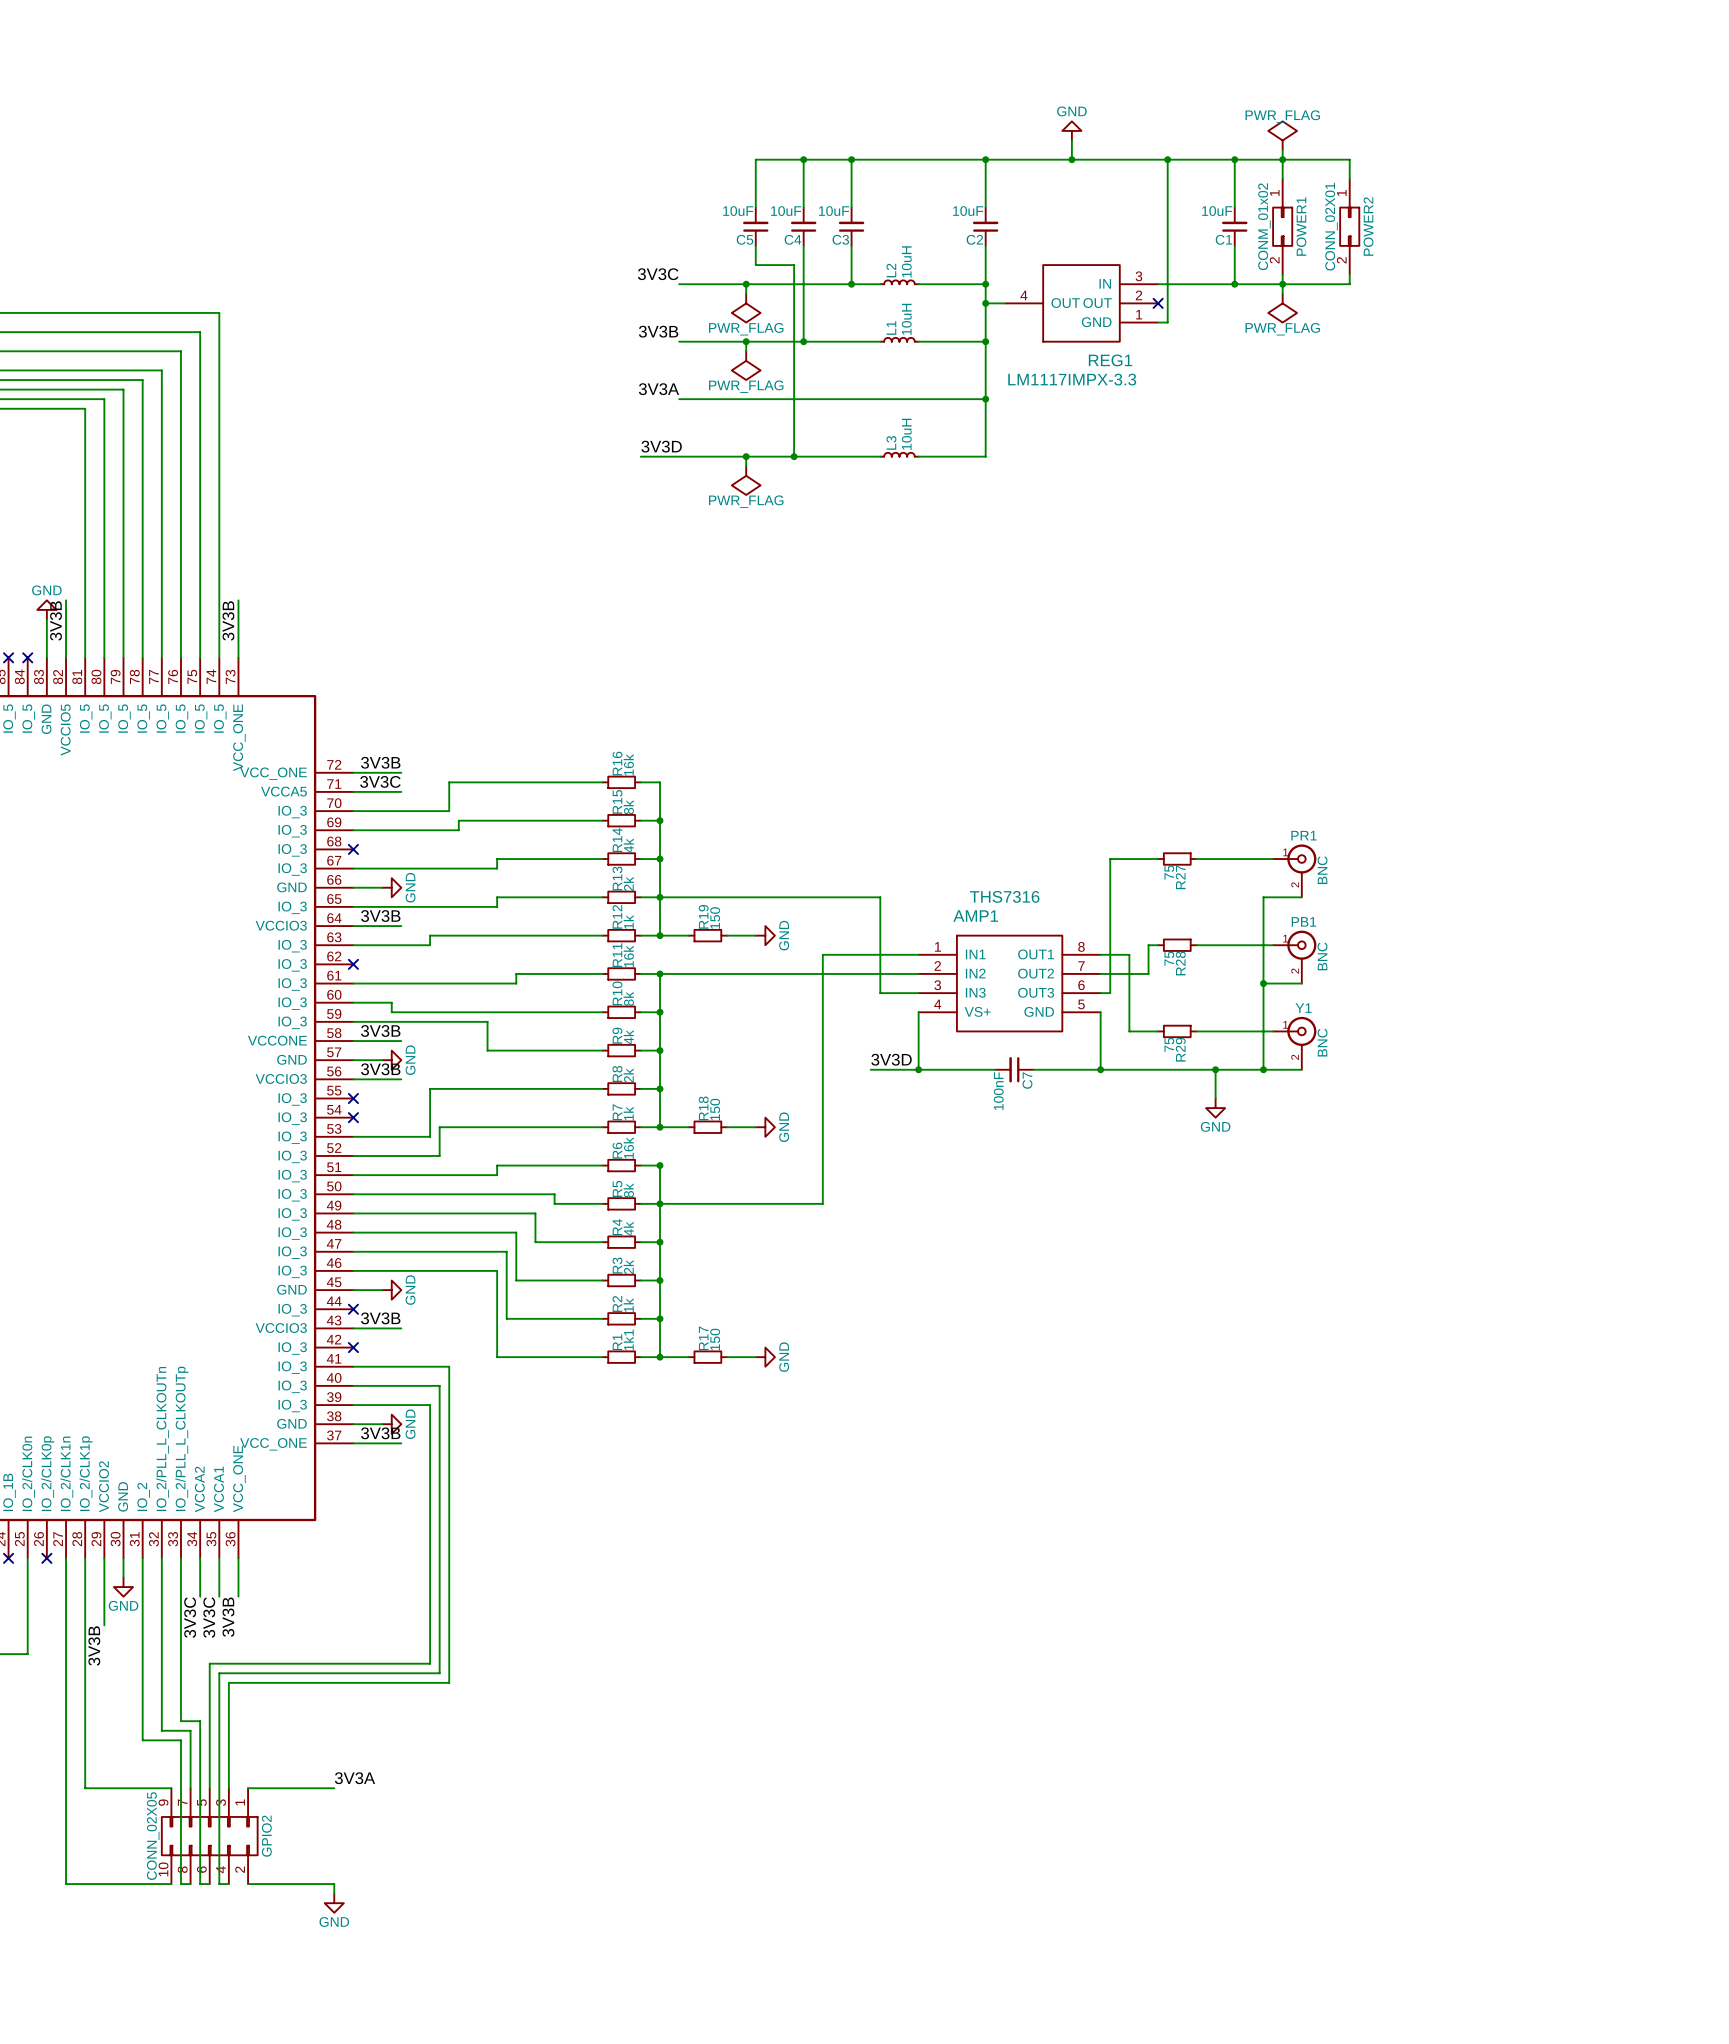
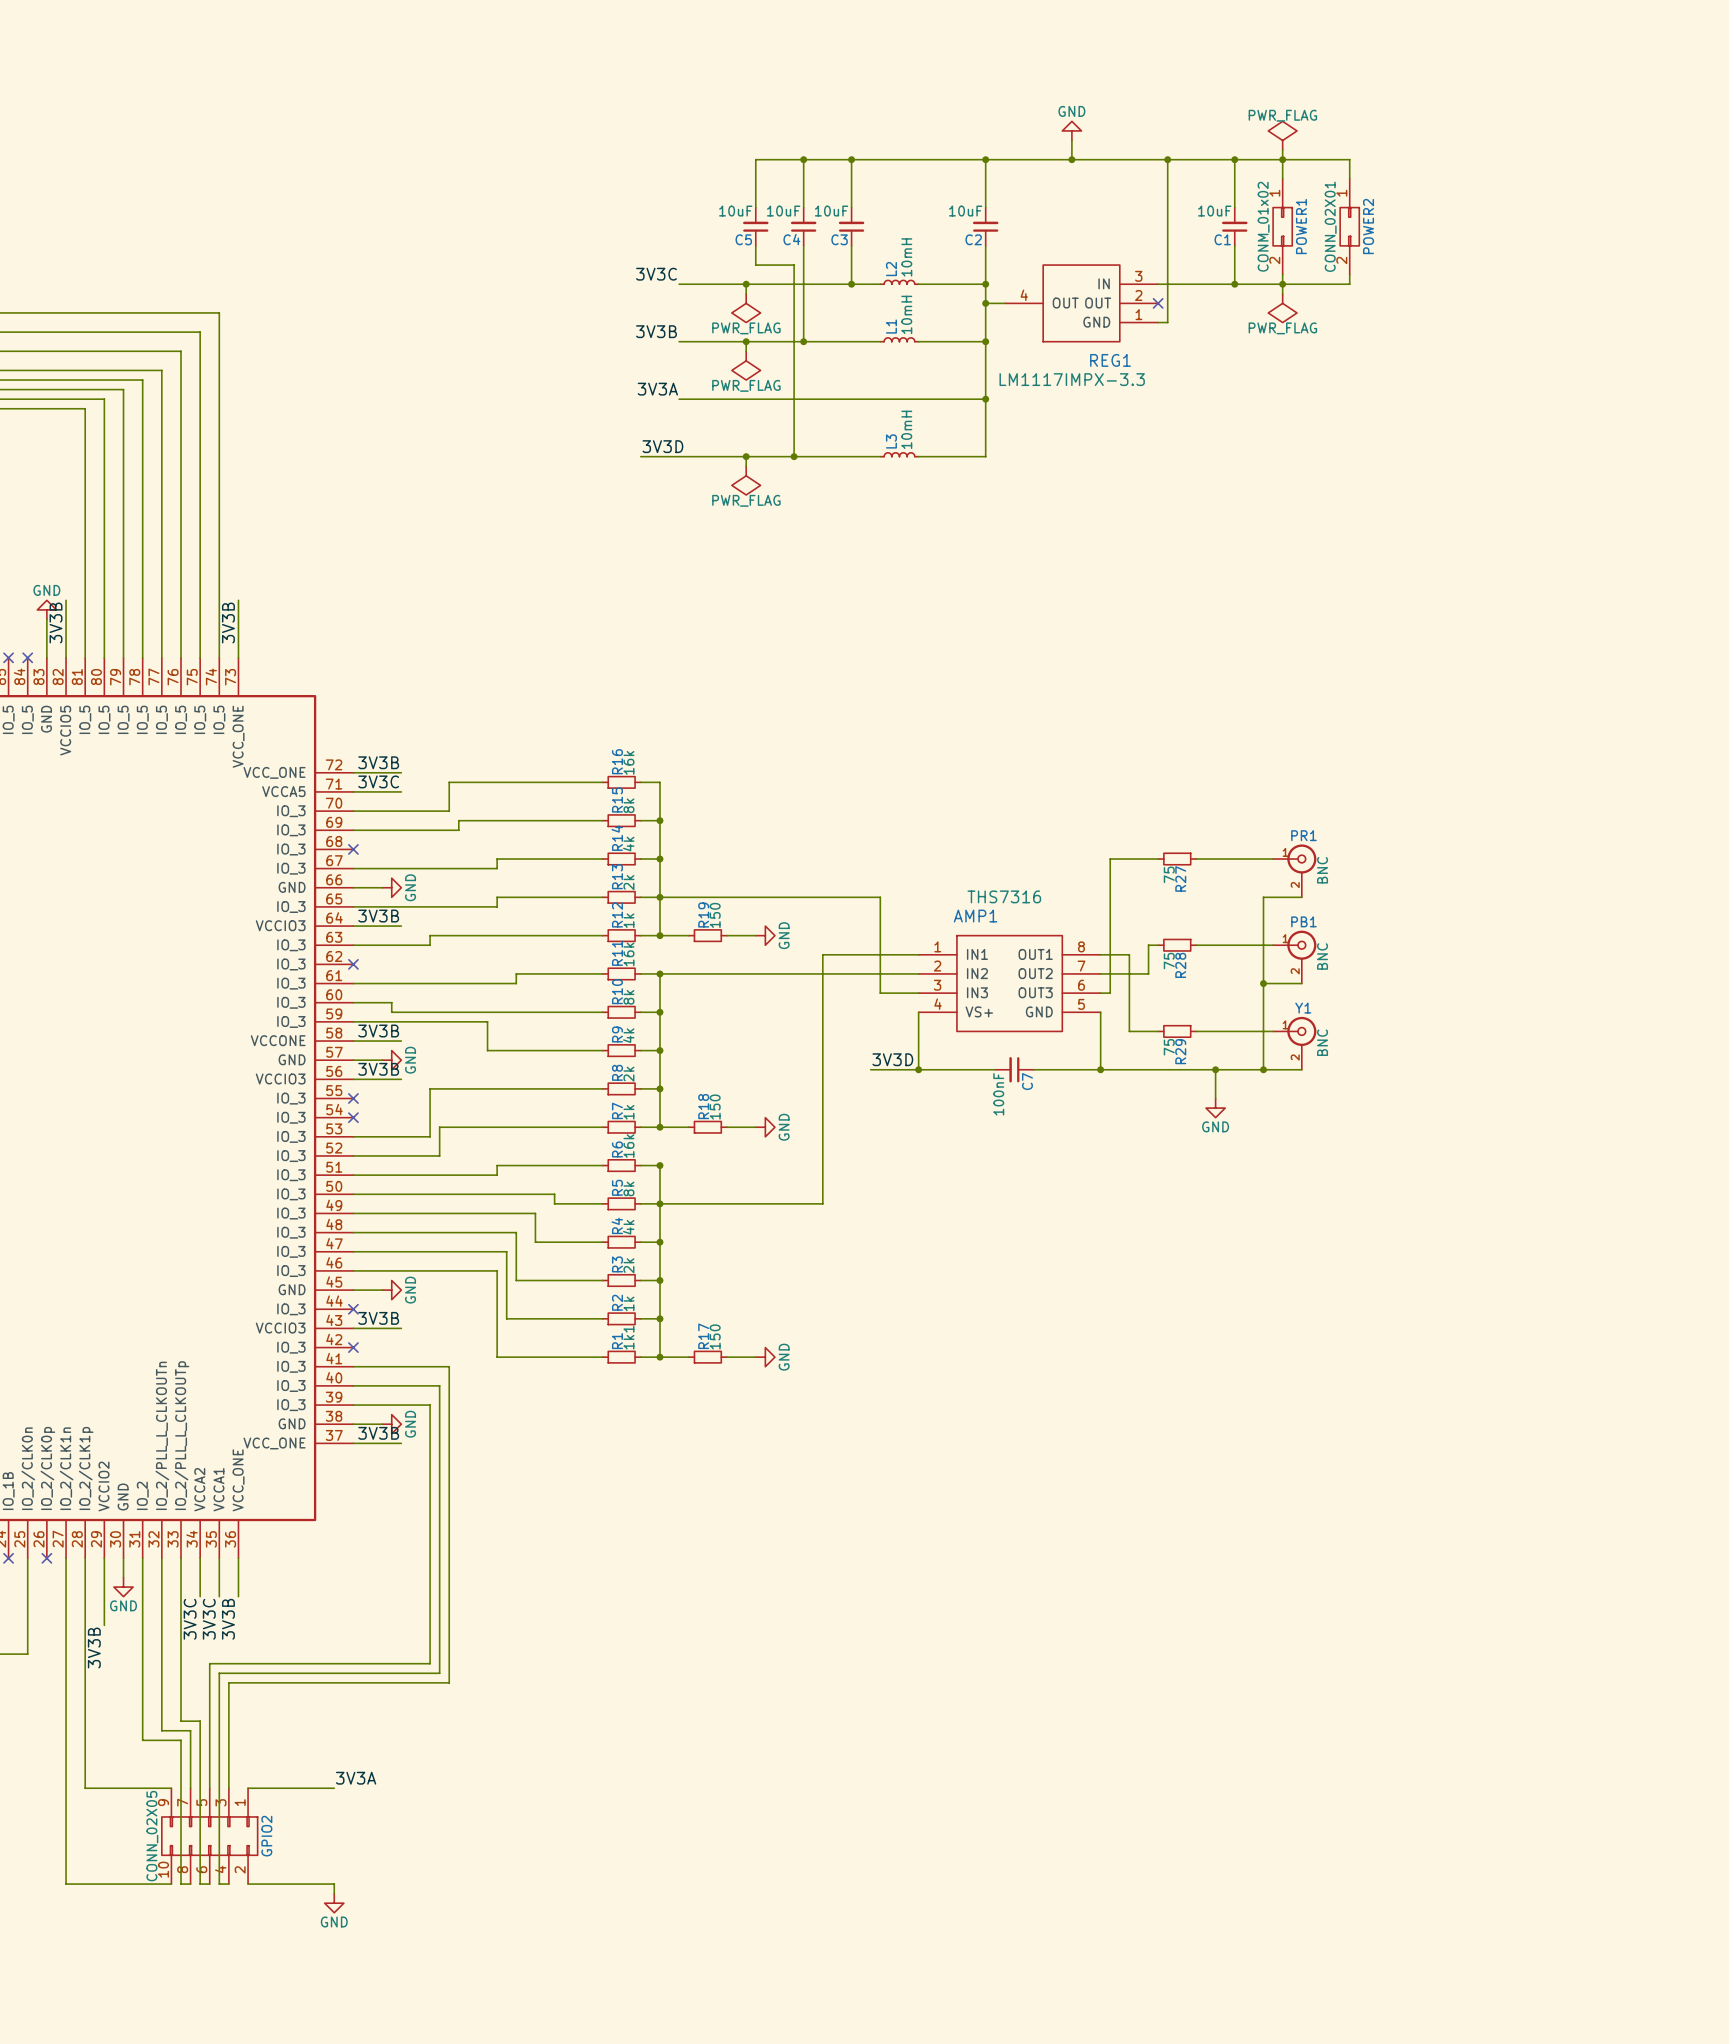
L2 value: 10uH (906, 261) -> 10mH (906, 257)
L1 value: 10uH (906, 319) -> 10mH (906, 314)
L3 value: 10uH (906, 434) -> 10mH (906, 429)

